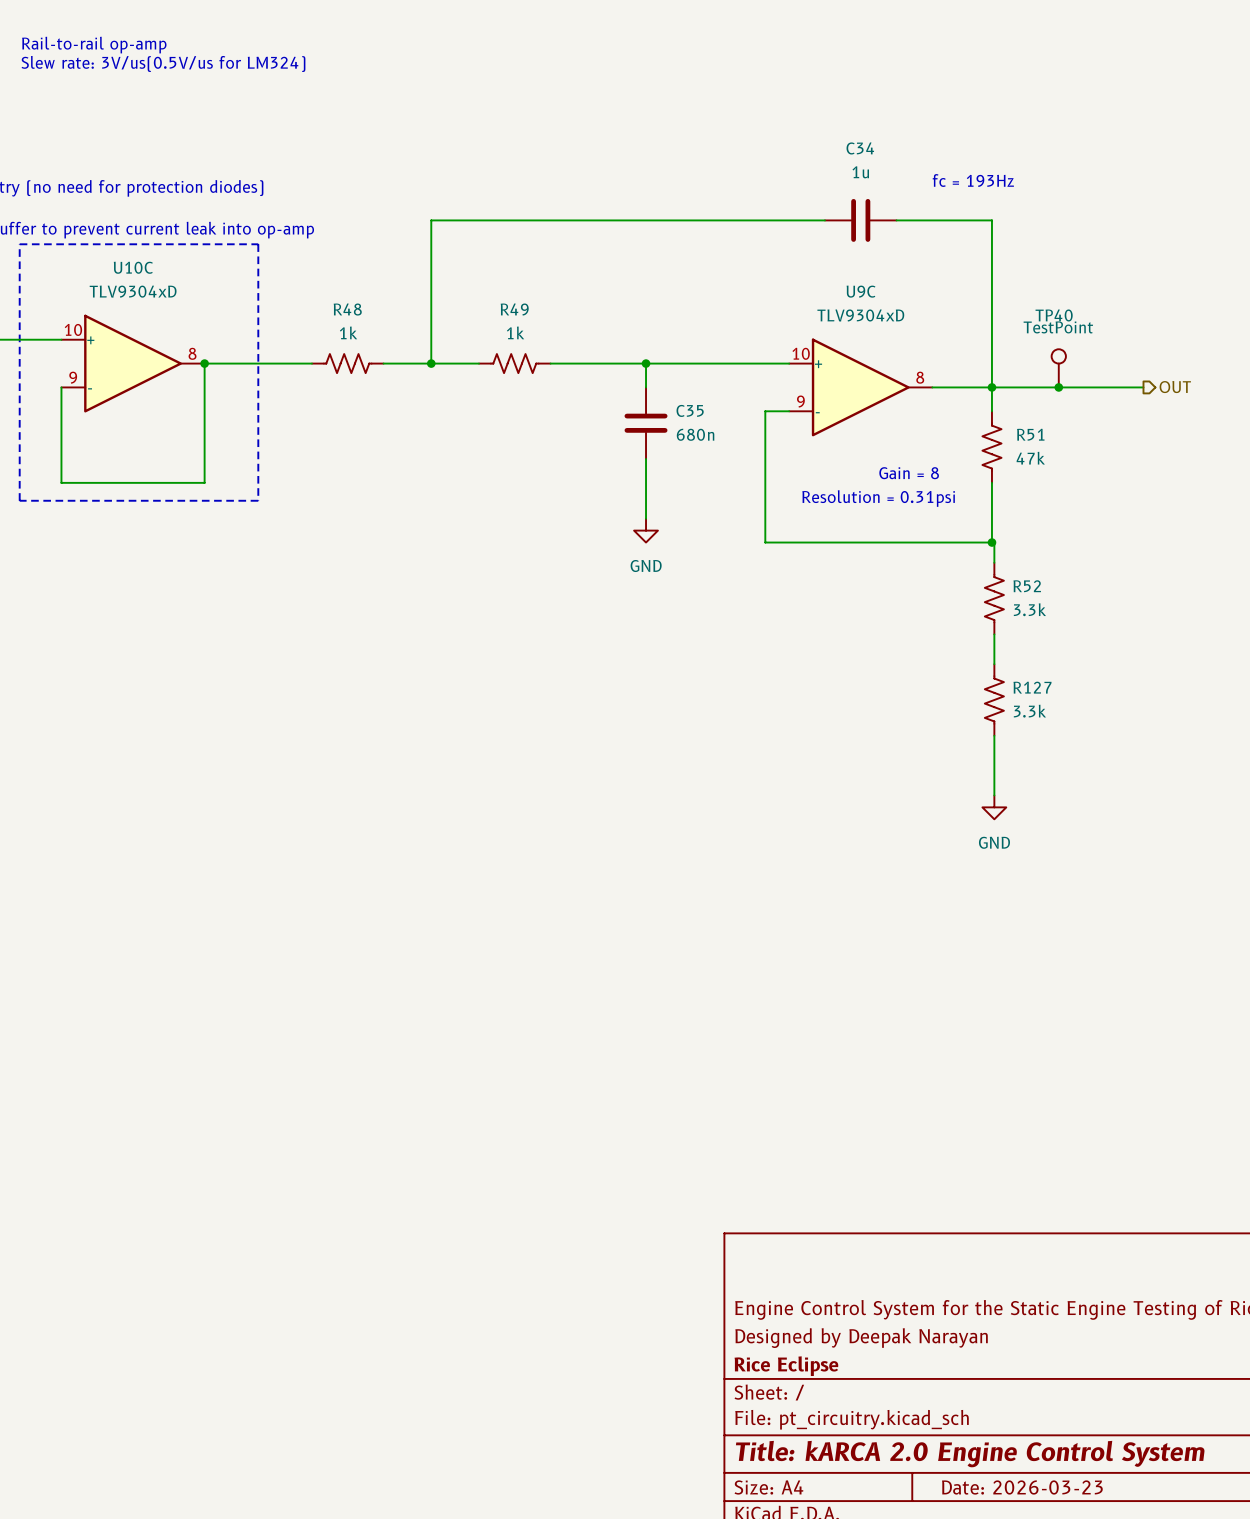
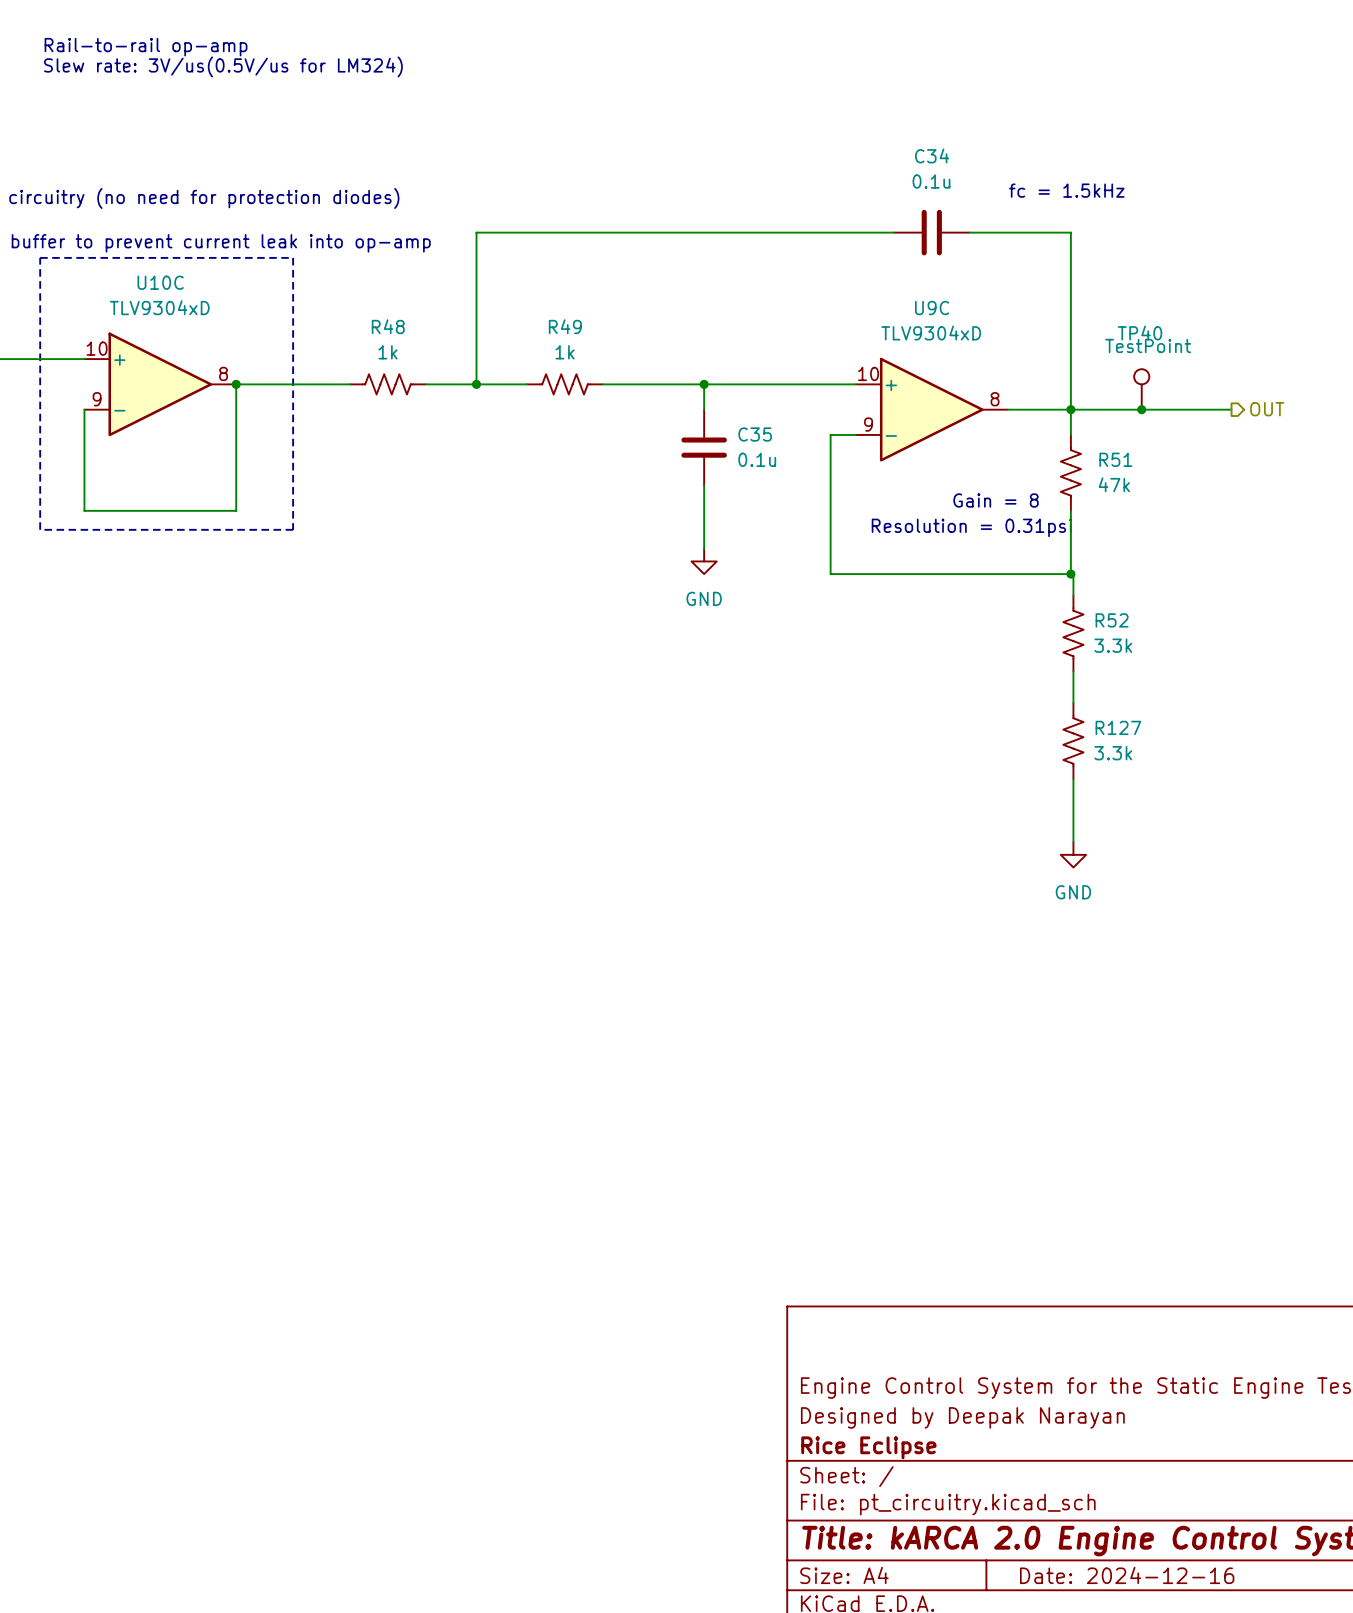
C34 value: 1u (860, 172) -> 0.1u (931, 181)
text: fc = 193Hz (973, 180) -> fc = 1.5kHz (1066, 190)
C35 value: 680n (695, 434) -> 0.1u (757, 459)
title block: Date: 2026-03-23 (1022, 1487) -> Date: 2024-12-16 (1127, 1575)

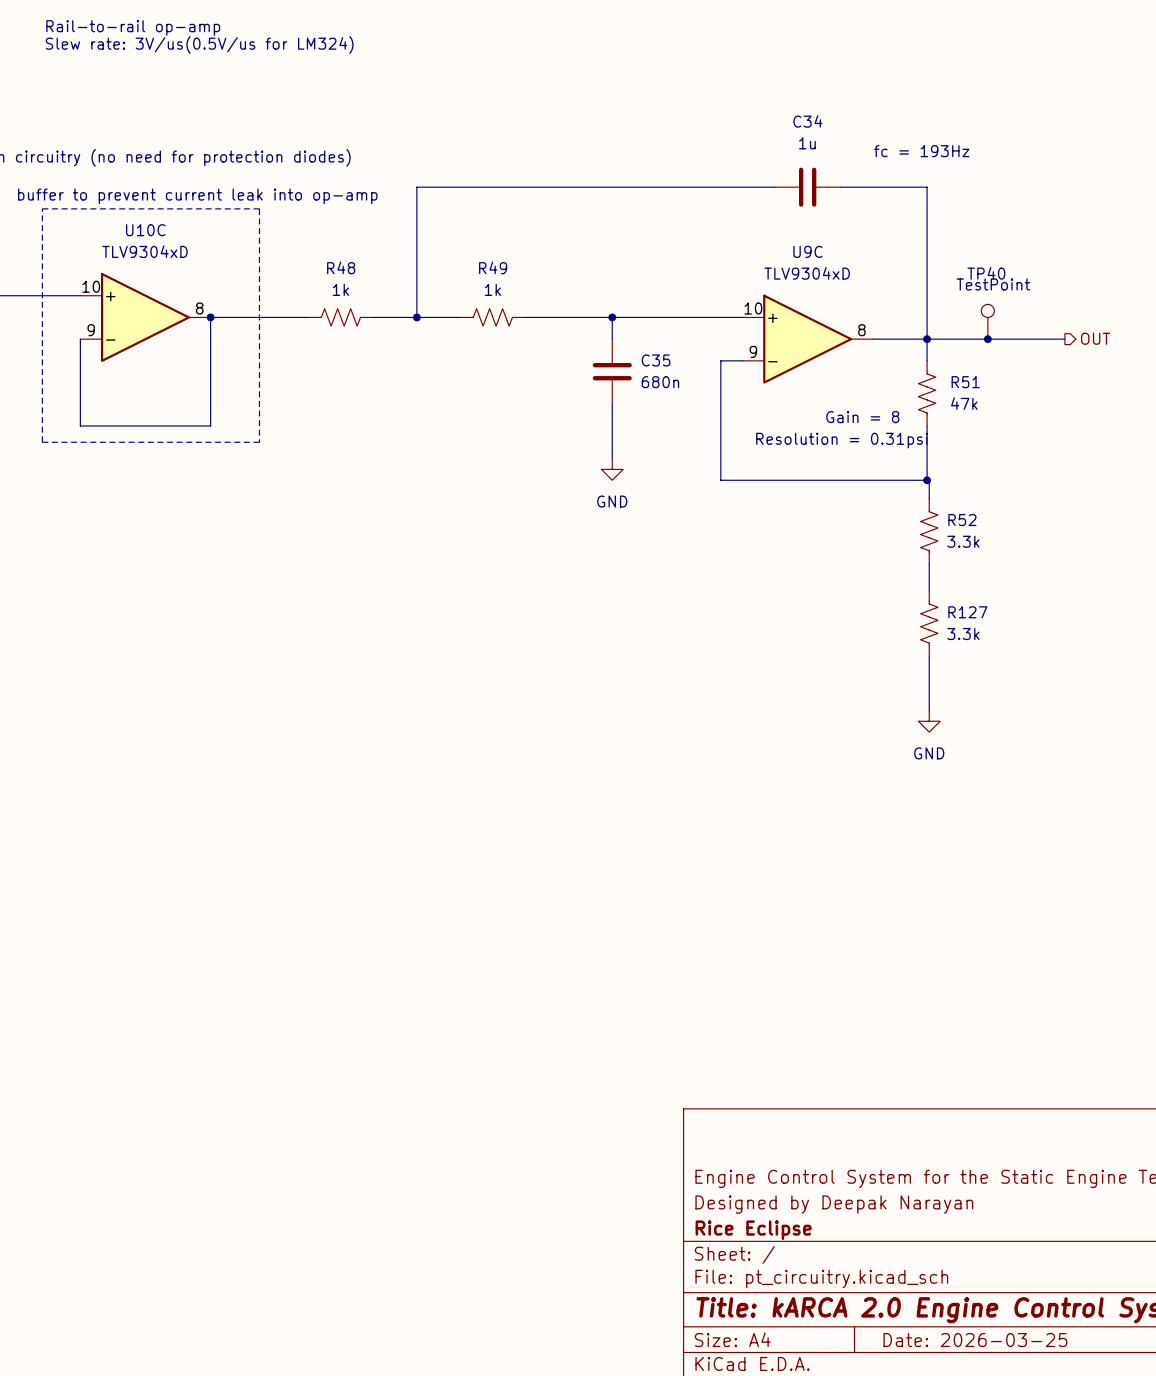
C34 value: 0.1u (931, 181) -> 1u (807, 143)
text: fc = 1.5kHz (1066, 190) -> fc = 193Hz (921, 151)
C35 value: 0.1u (757, 459) -> 680n (660, 382)
title block: Date: 2024-12-16 (1127, 1575) -> Date: 2026-03-25 (975, 1340)

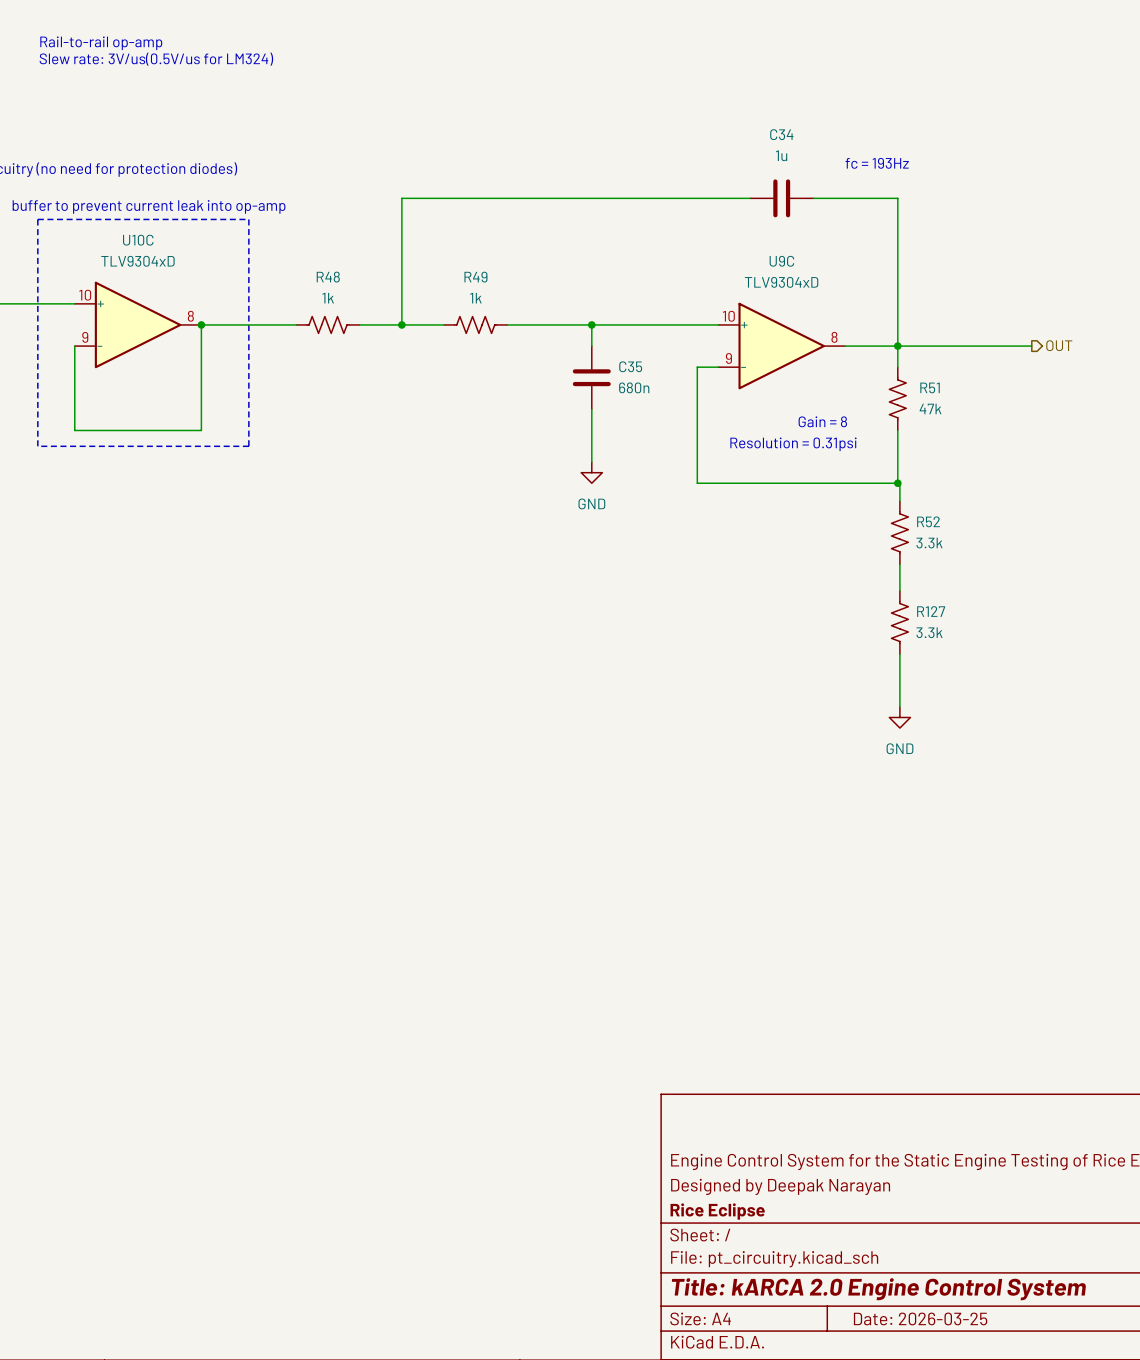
TP40: TestPoint (987, 321) -> none
junction: (987, 339) -> none

